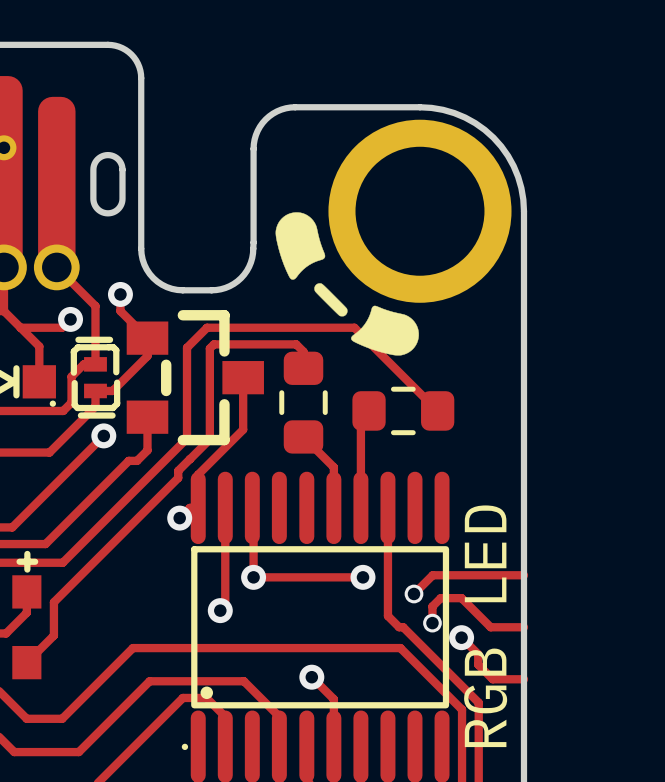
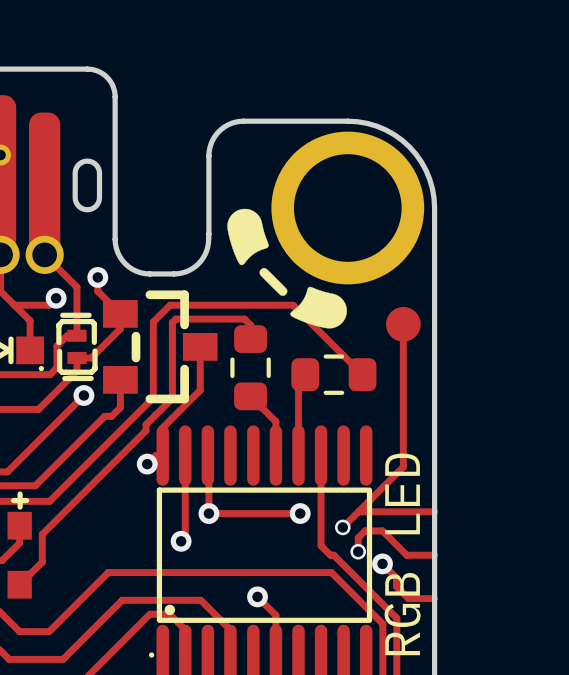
track: none -> (403, 324) (403, 466) (358, 511)
part: none -> (403, 324)

